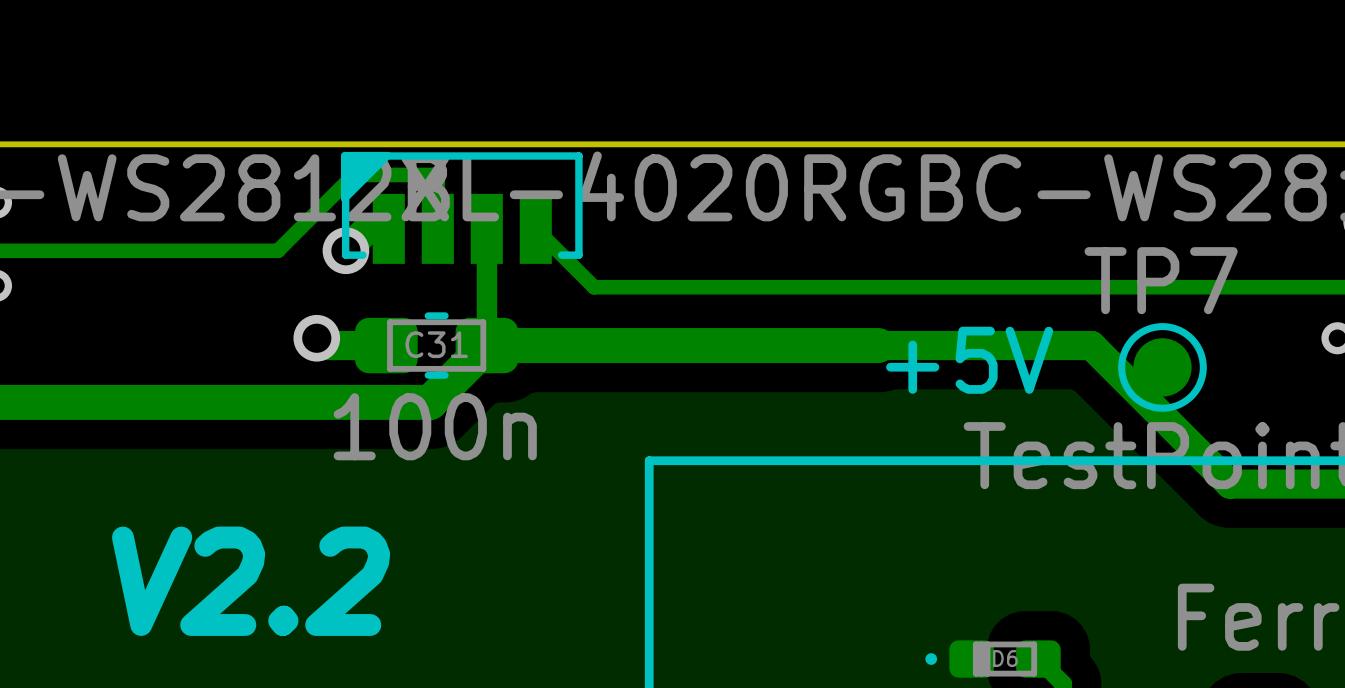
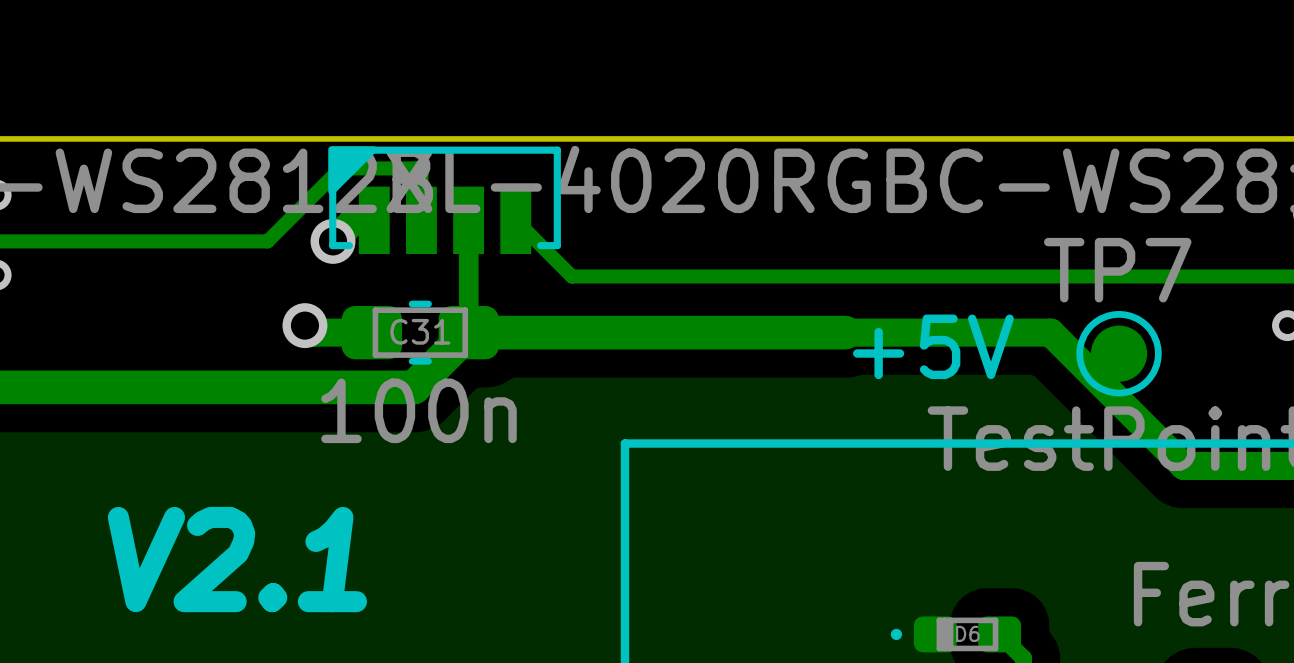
text: V2.2 (251, 581) -> V2.1 (237, 559)

